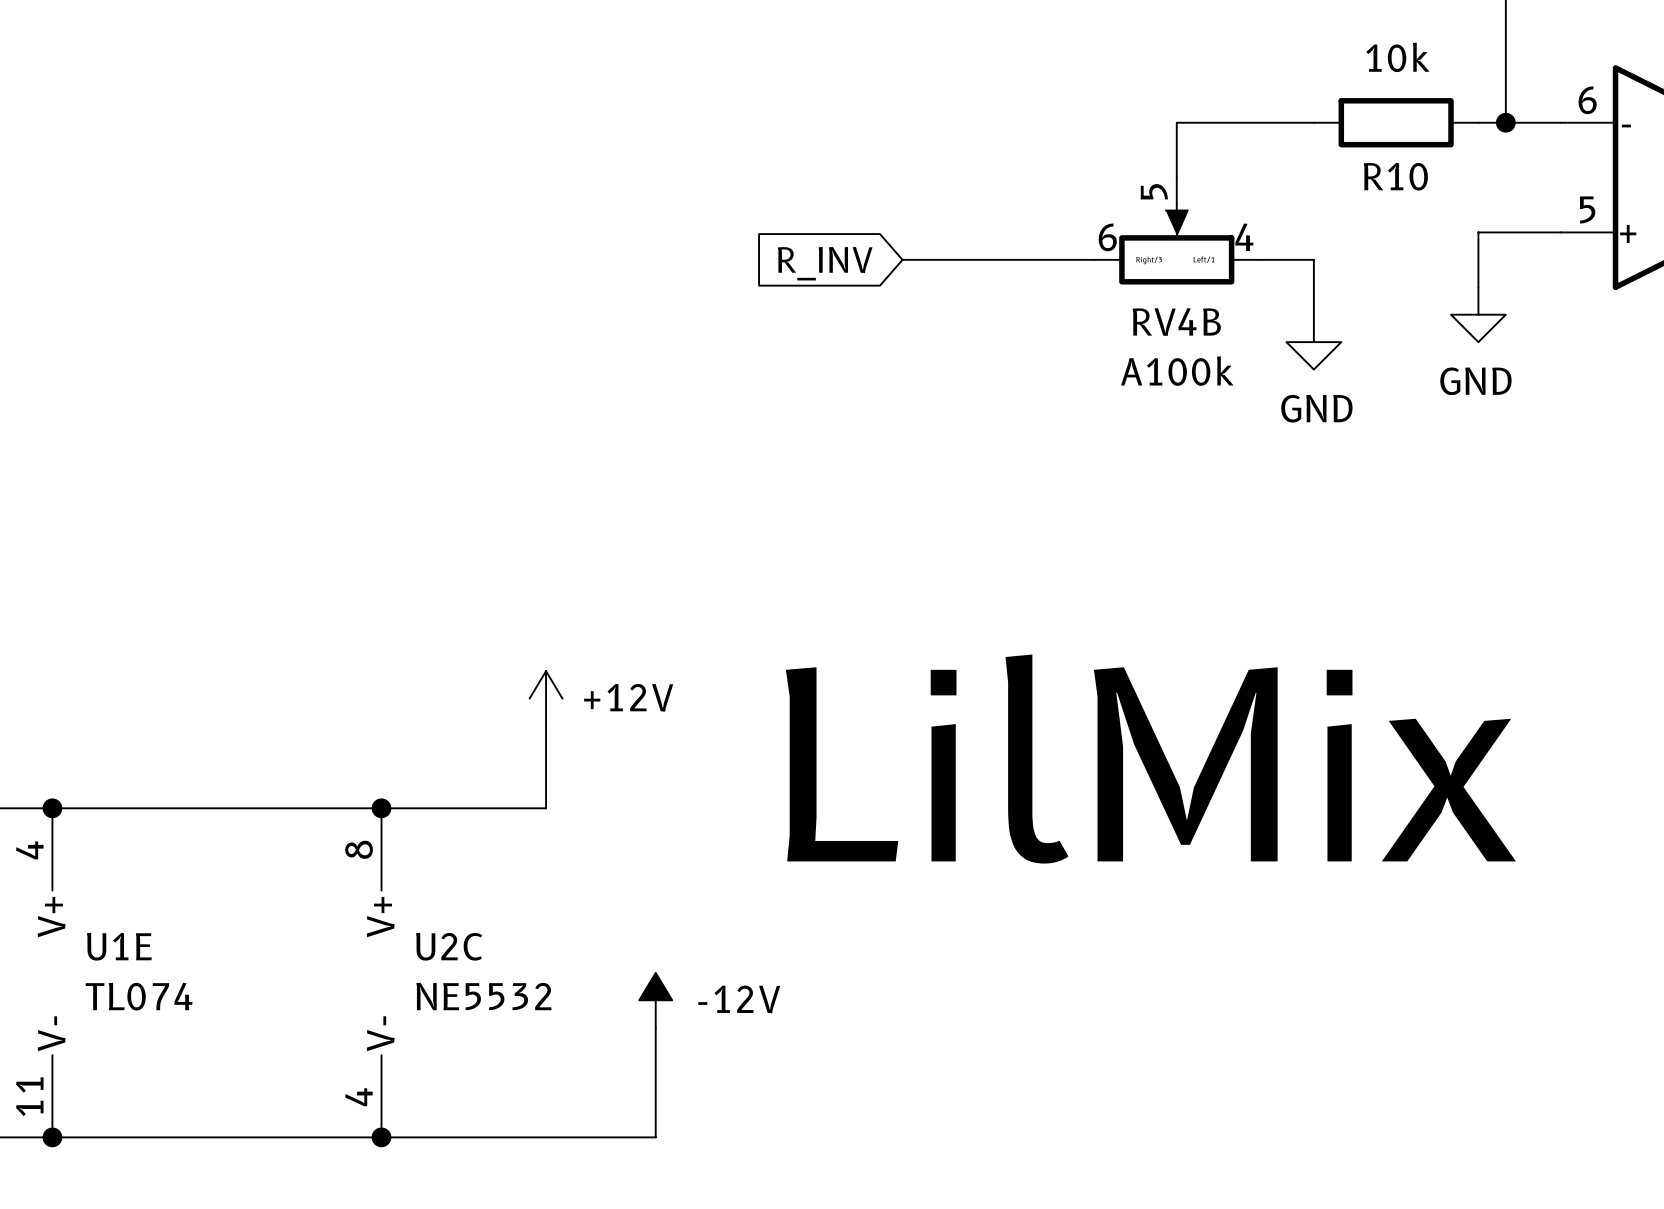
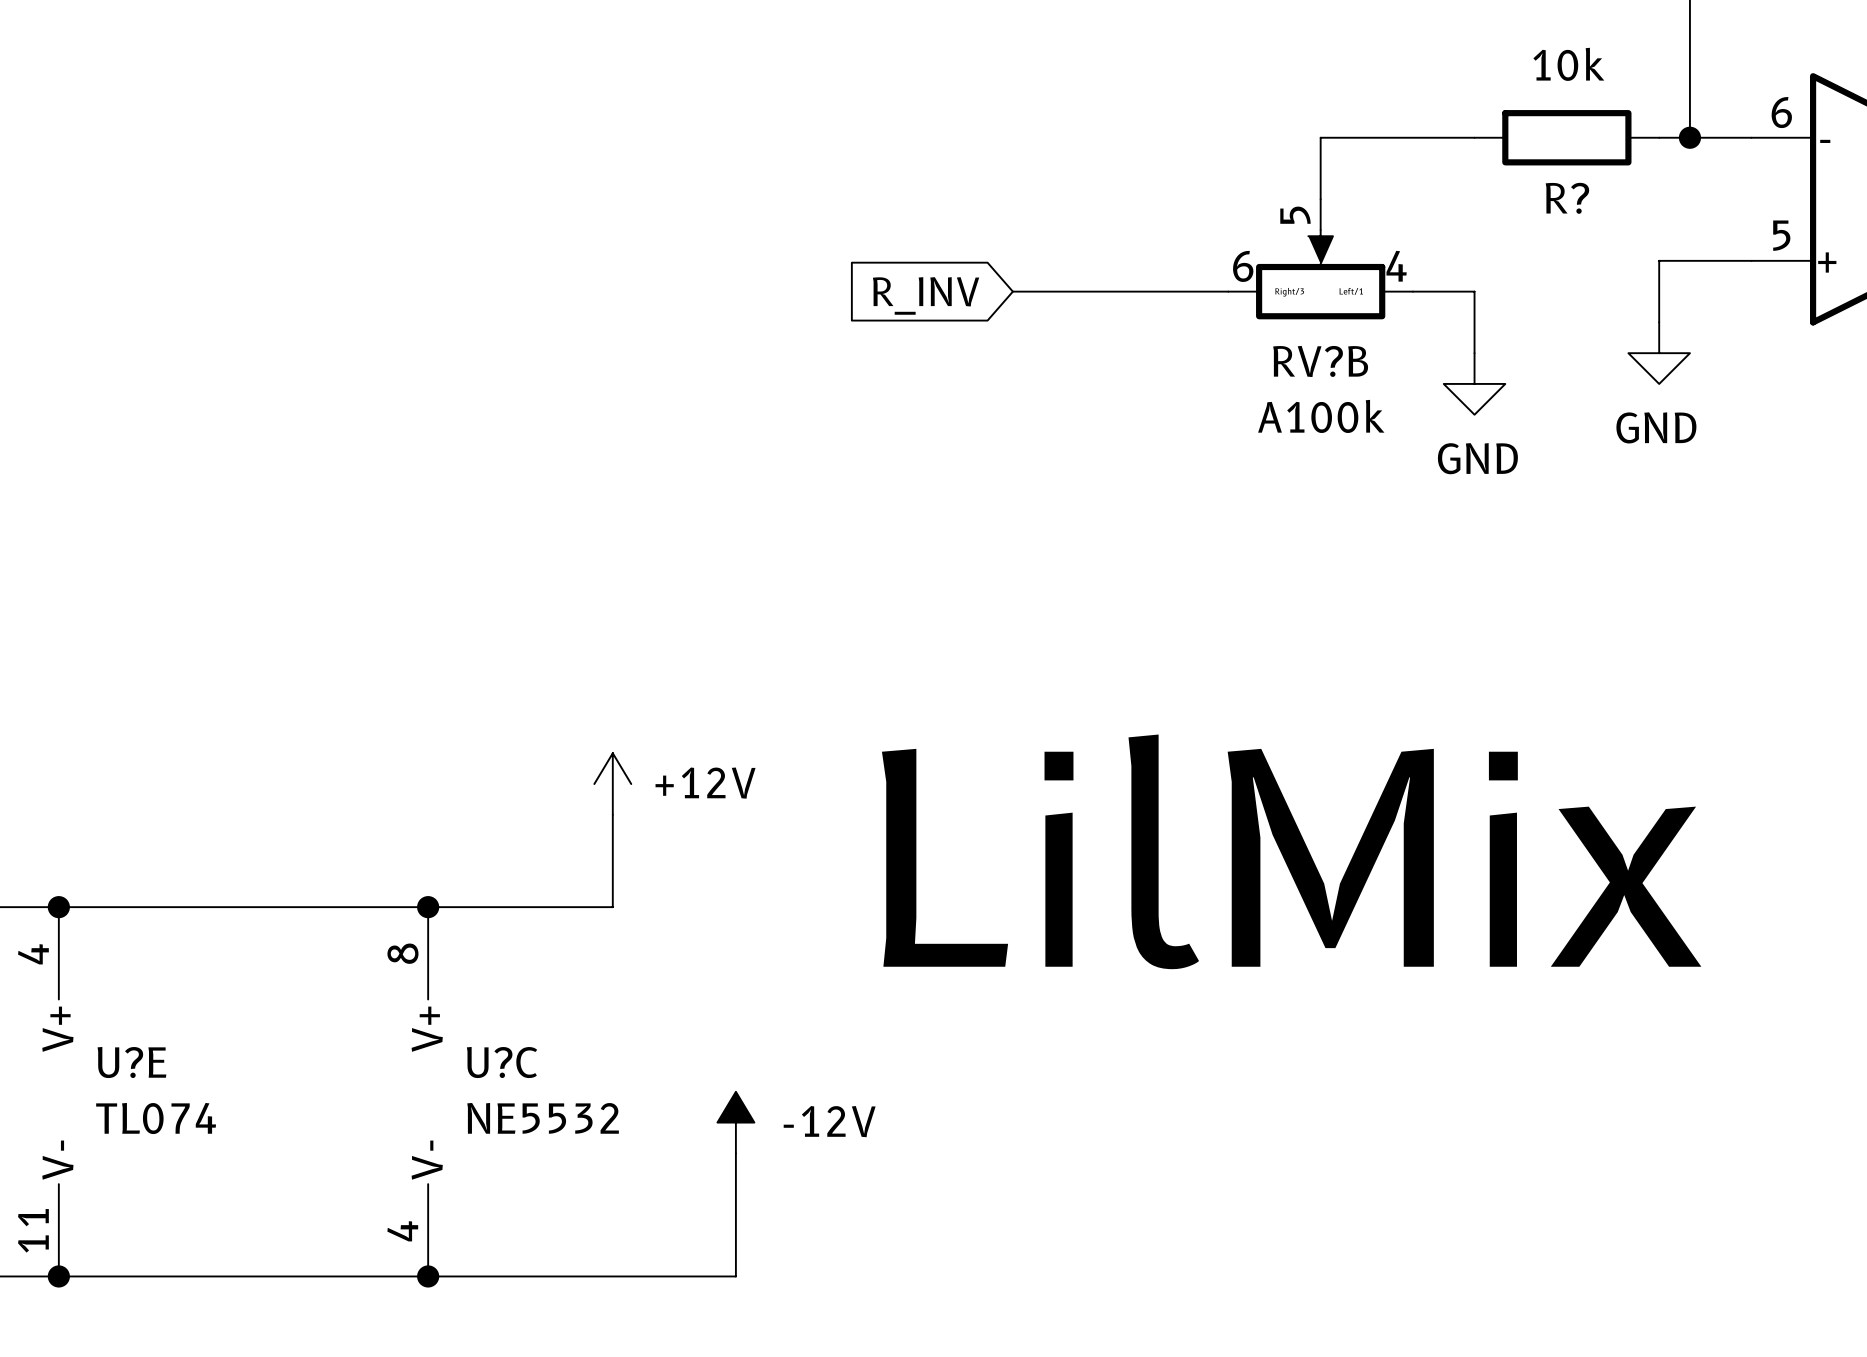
R10 name: R10 (1395, 176) -> R? (1567, 198)
RV4B name: RV4B (1176, 322) -> RV?B (1320, 361)
U1E name: U1E (119, 946) -> U?E (131, 1062)
U2C name: U2C (449, 946) -> U?C (502, 1062)

